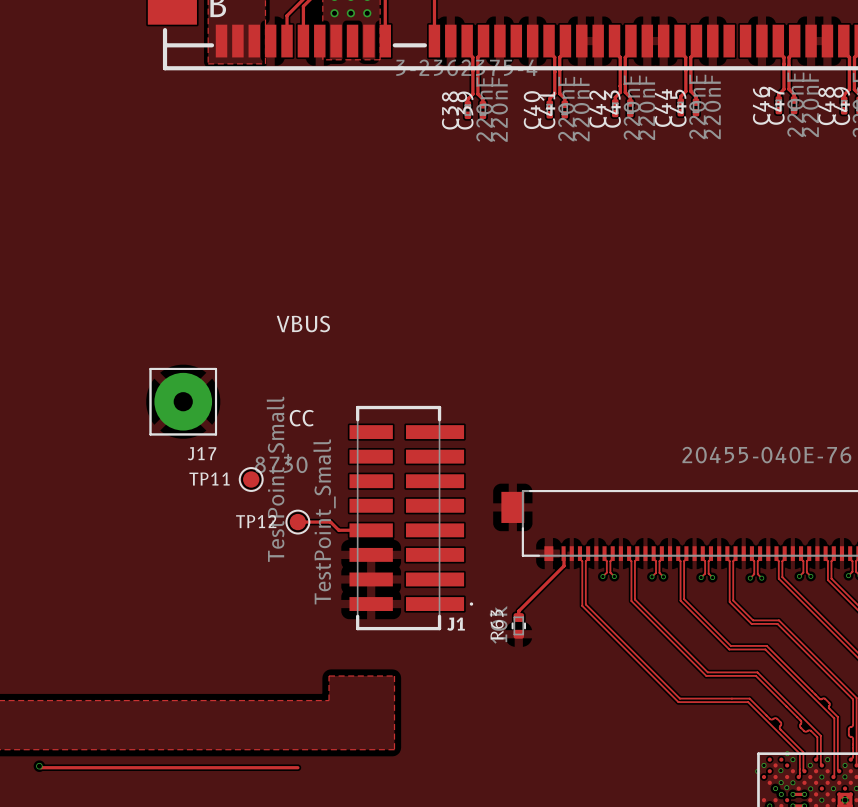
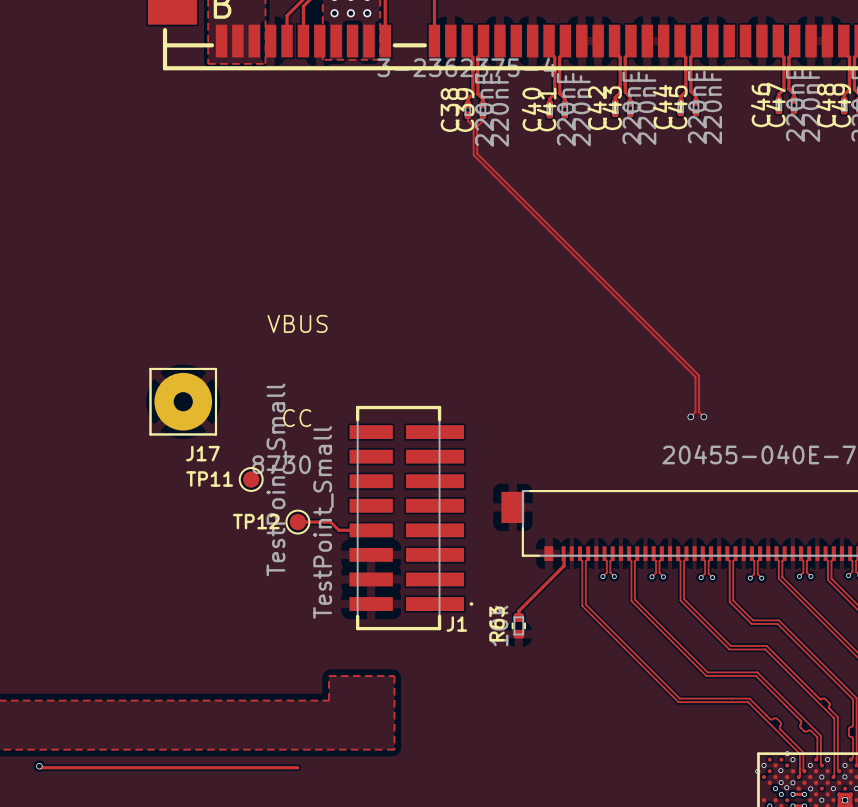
track: none -> (467, 115) (467, 120) (473, 126) (473, 155) (695, 377) (695, 412) (690, 416)
track: none -> (482, 115) (482, 120) (477, 126) (477, 153) (699, 375) (699, 412) (703, 416)
via: none -> (690, 416)
via: none -> (703, 416)

